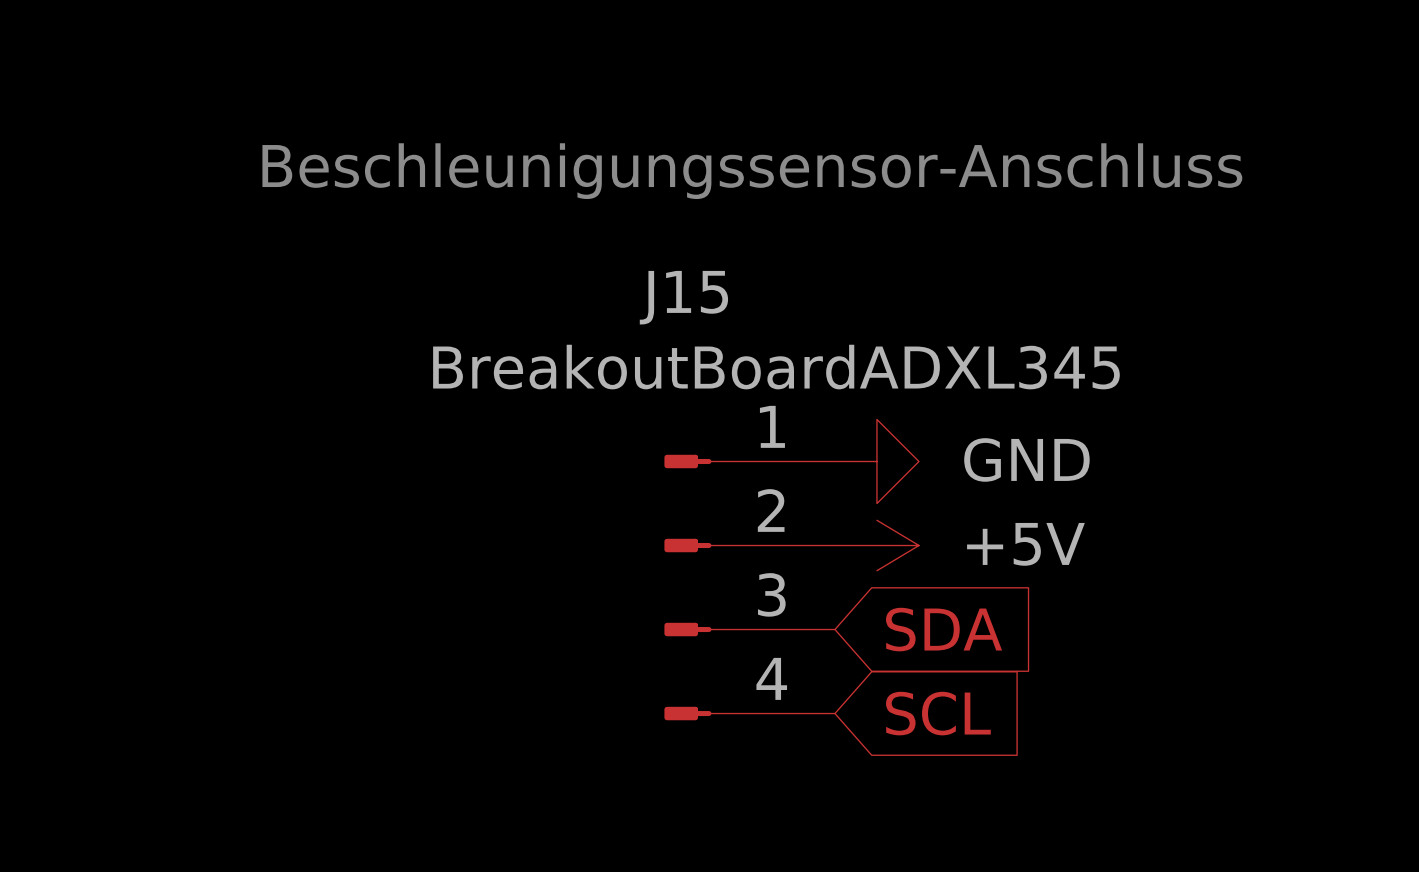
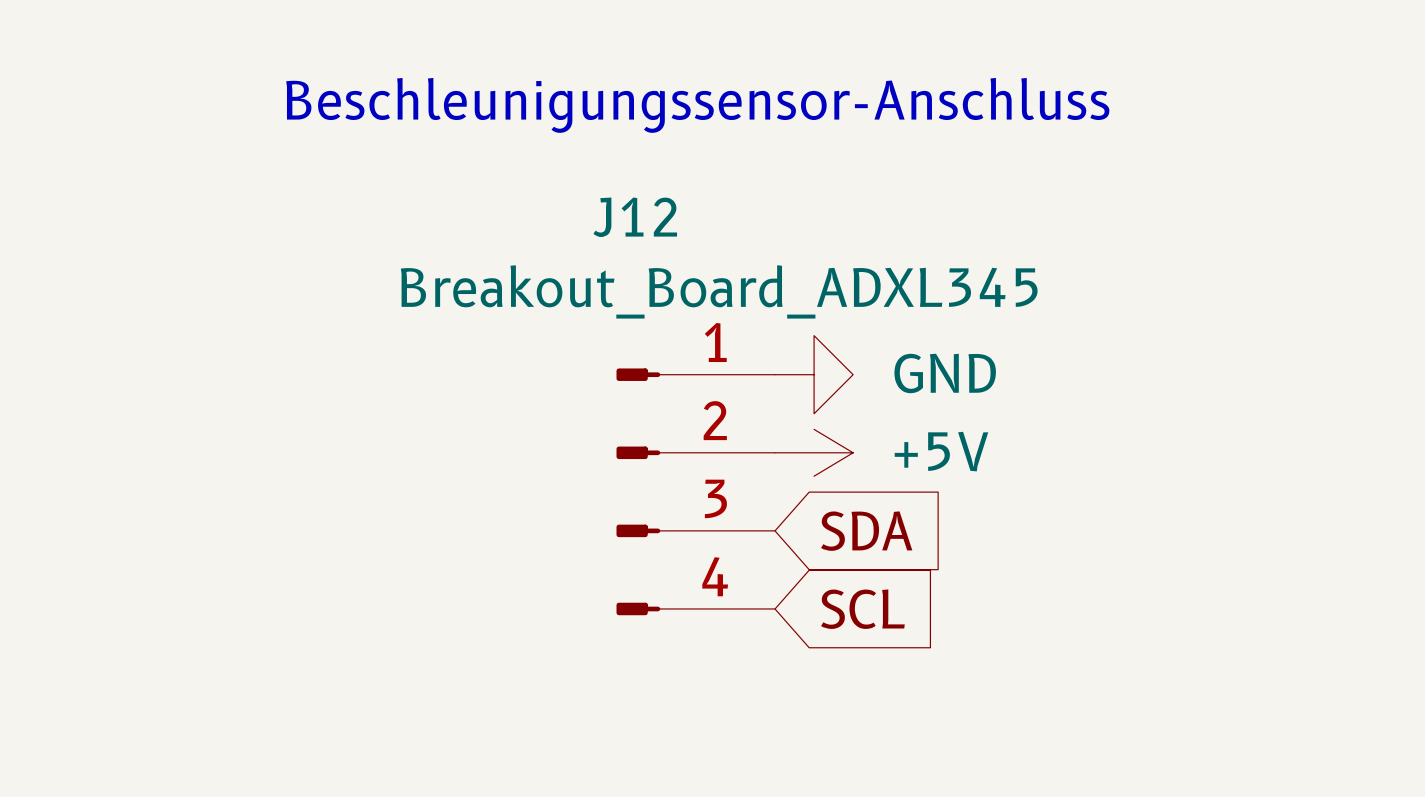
J15 name: J15 (683, 297) -> J12 (635, 217)
J15 value: BreakoutBoardADXL345 (776, 367) -> Breakout_Board_ADXL345 (719, 291)

